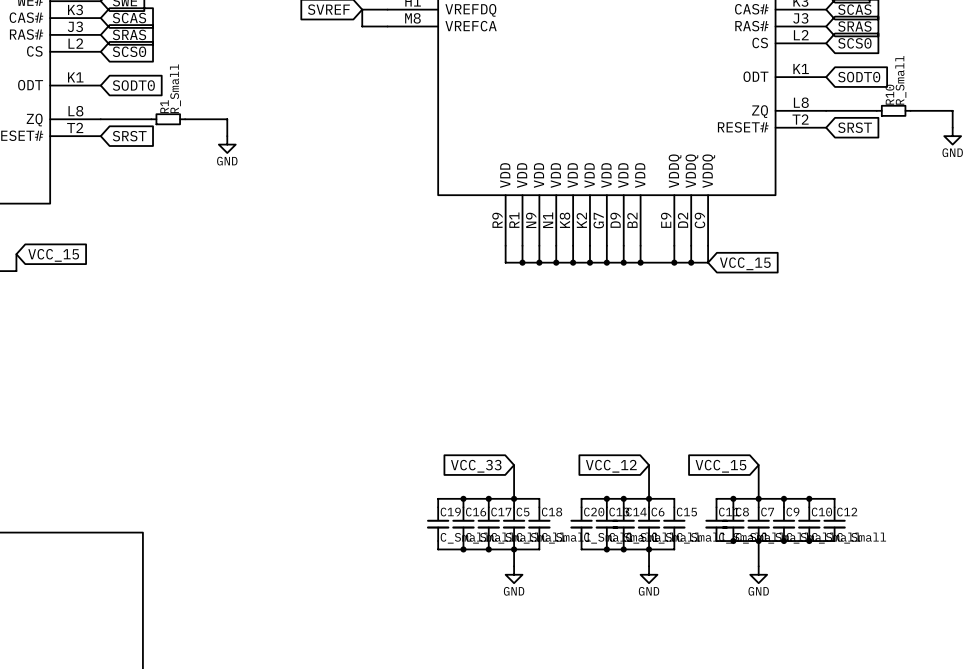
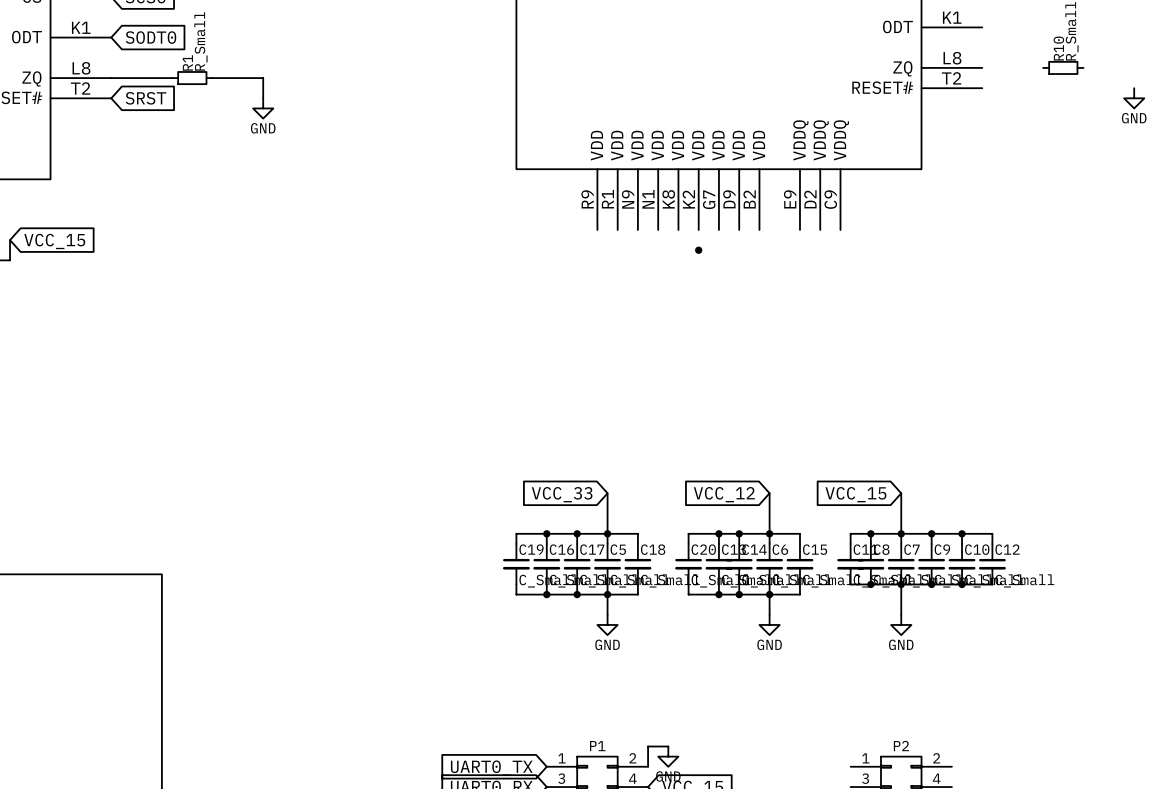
global label: SODT0 (859, 77) -> none
wire: (826, 110) (876, 110) -> none
wire: (910, 110) (952, 110) (952, 127) -> none
global label: SRST (855, 127) -> none
wire: (505, 245) (505, 262) (708, 262) (708, 245) -> none
wire: (522, 245) (522, 262) -> none
wire: (539, 245) (539, 262) -> none
wire: (556, 245) (556, 262) -> none
wire: (573, 245) (573, 262) -> none
wire: (589, 245) (589, 262) -> none
wire: (606, 245) (606, 262) -> none
wire: (623, 245) (623, 262) -> none
wire: (640, 245) (640, 262) -> none
wire: (674, 245) (674, 262) -> none
wire: (691, 245) (691, 262) -> none
junction: (522, 262) -> none
junction: (539, 262) -> none
junction: (556, 262) -> none
junction: (573, 262) -> none
junction: (606, 262) -> none
junction: (623, 262) -> none
junction: (640, 262) -> none
junction: (674, 262) -> none
junction: (691, 262) -> none
global label: VCC_15 (745, 263) -> none

